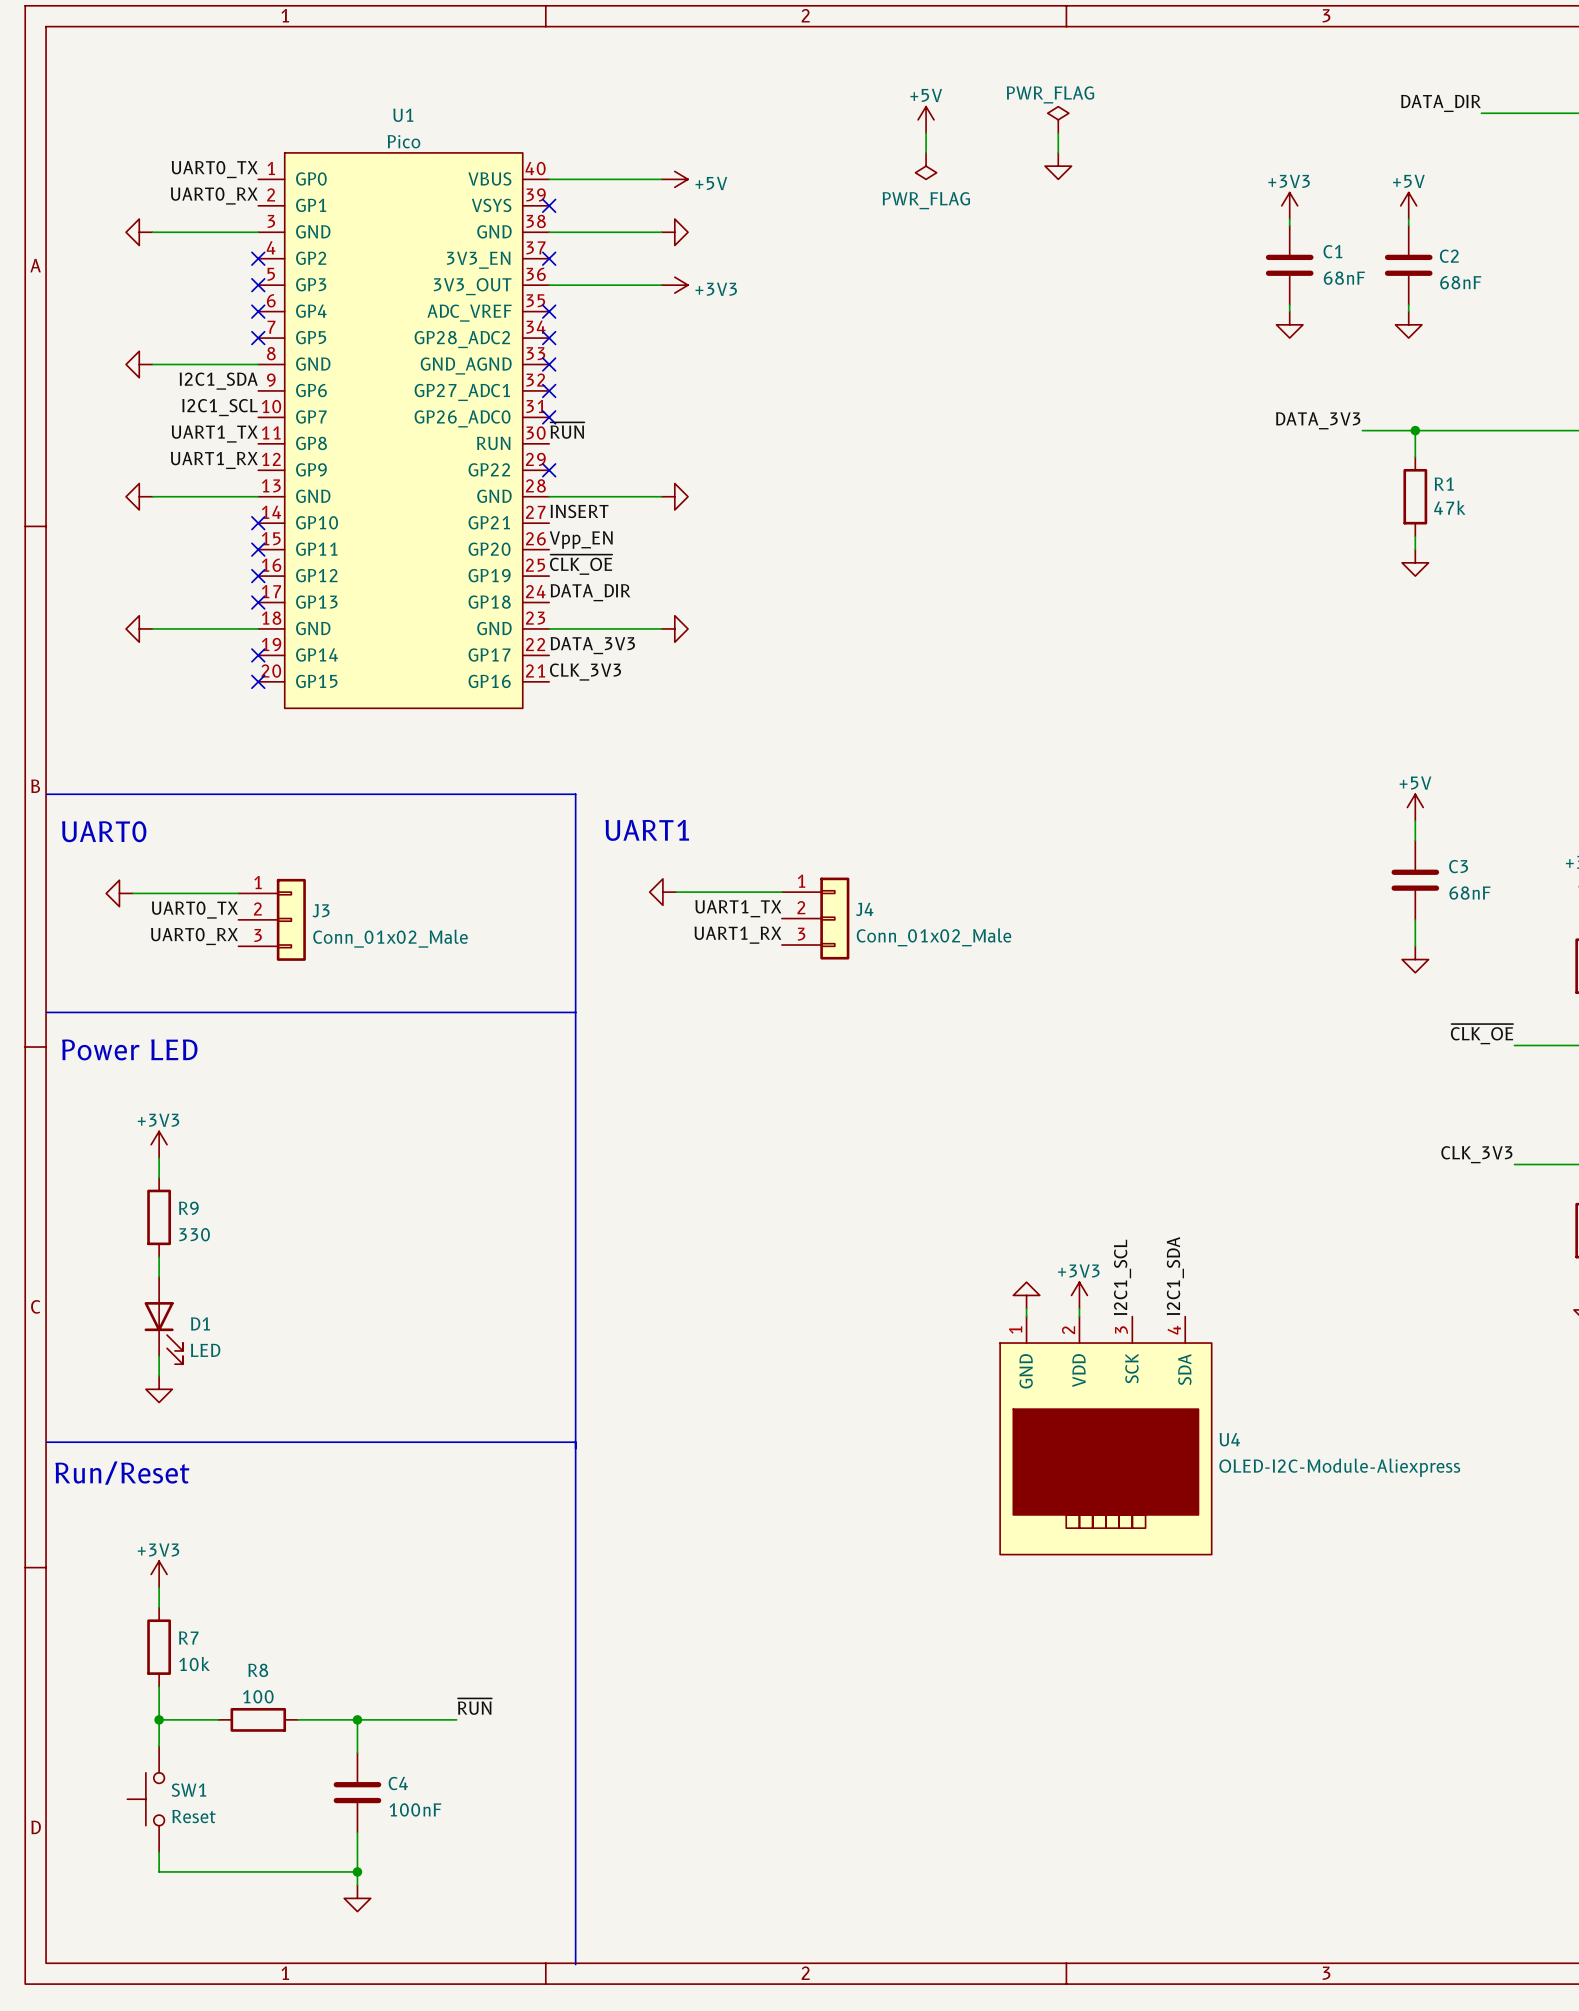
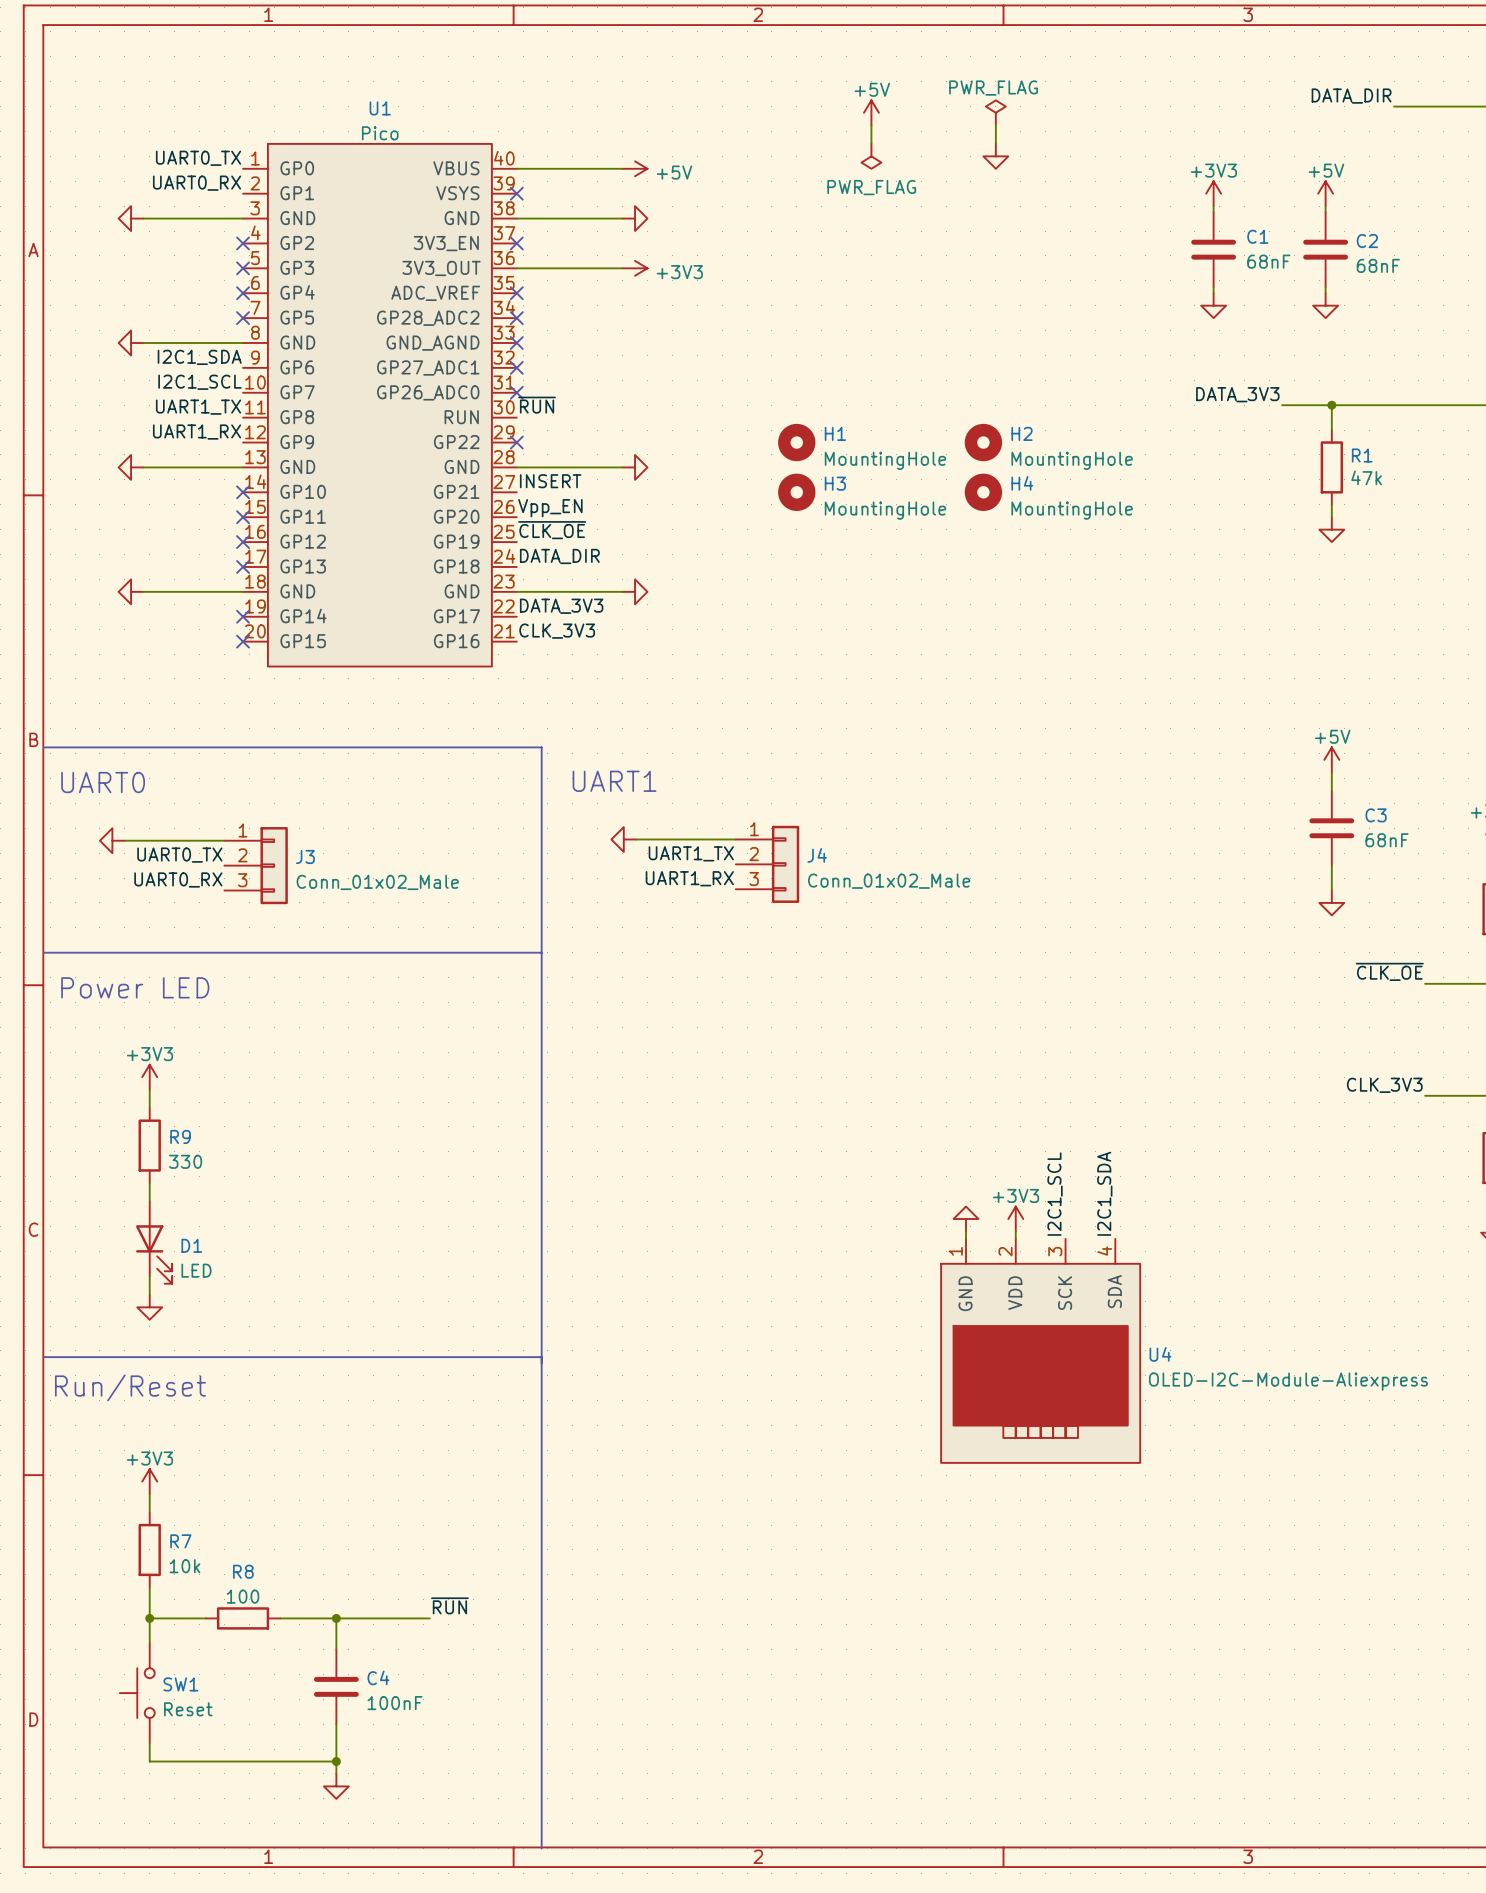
H1: none -> MountingHole (796, 442)
H2: none -> MountingHole (983, 442)
H3: none -> MountingHole (796, 492)
H4: none -> MountingHole (983, 492)

